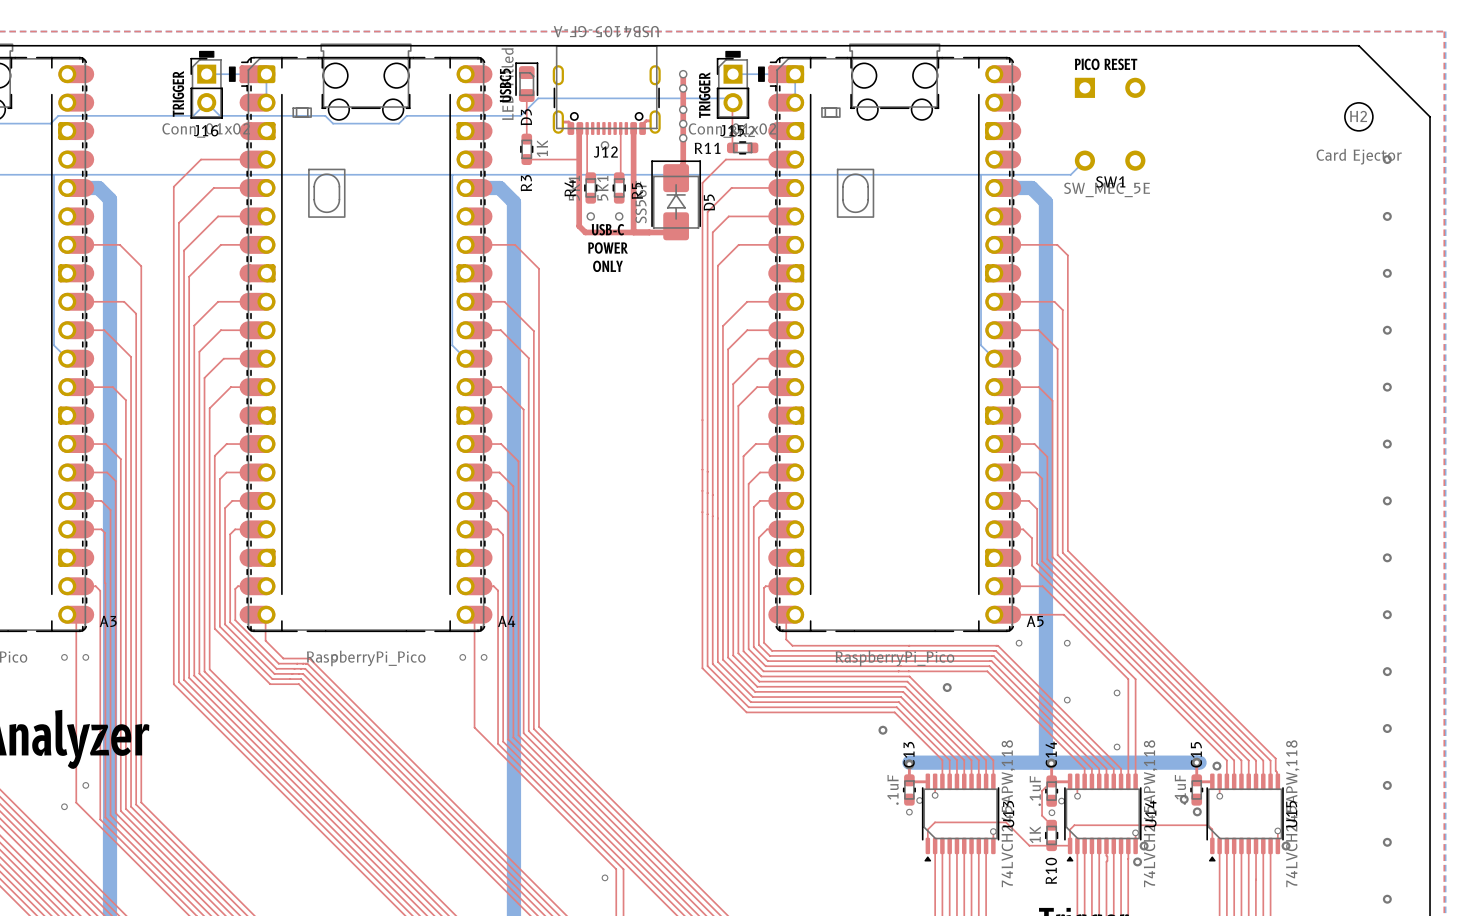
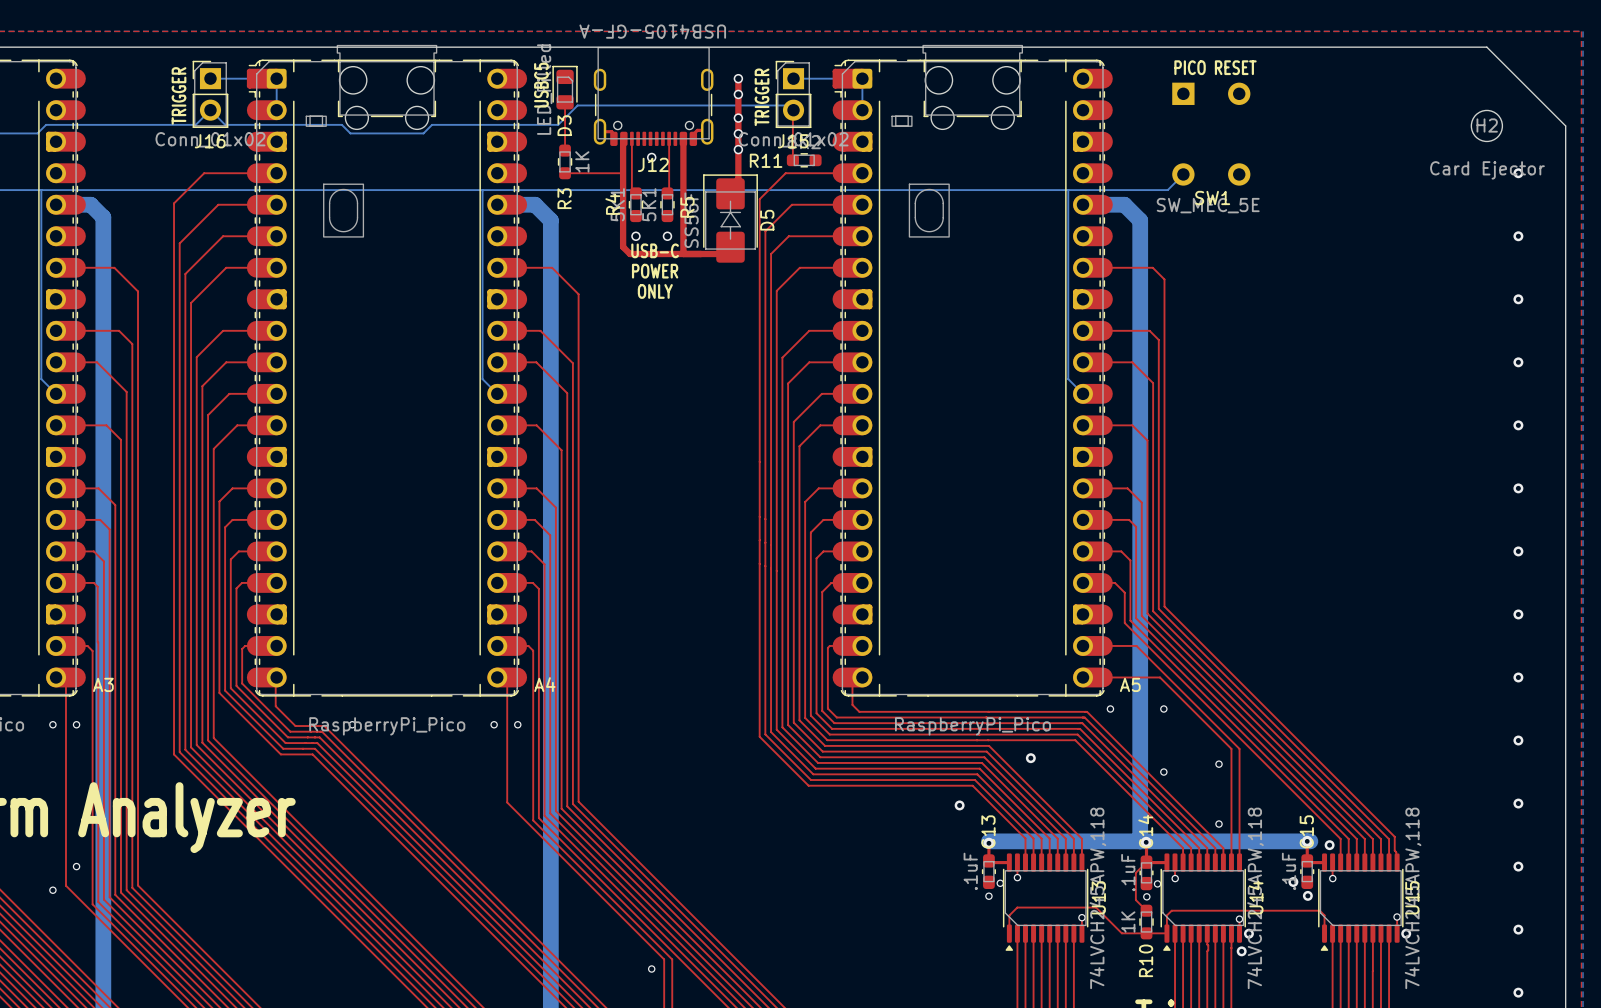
drawing: [199, 50, 215, 58] -> none
drawing: [725, 50, 741, 58] -> none
drawing: [228, 66, 236, 82] -> none
drawing: [758, 66, 765, 82] -> none

